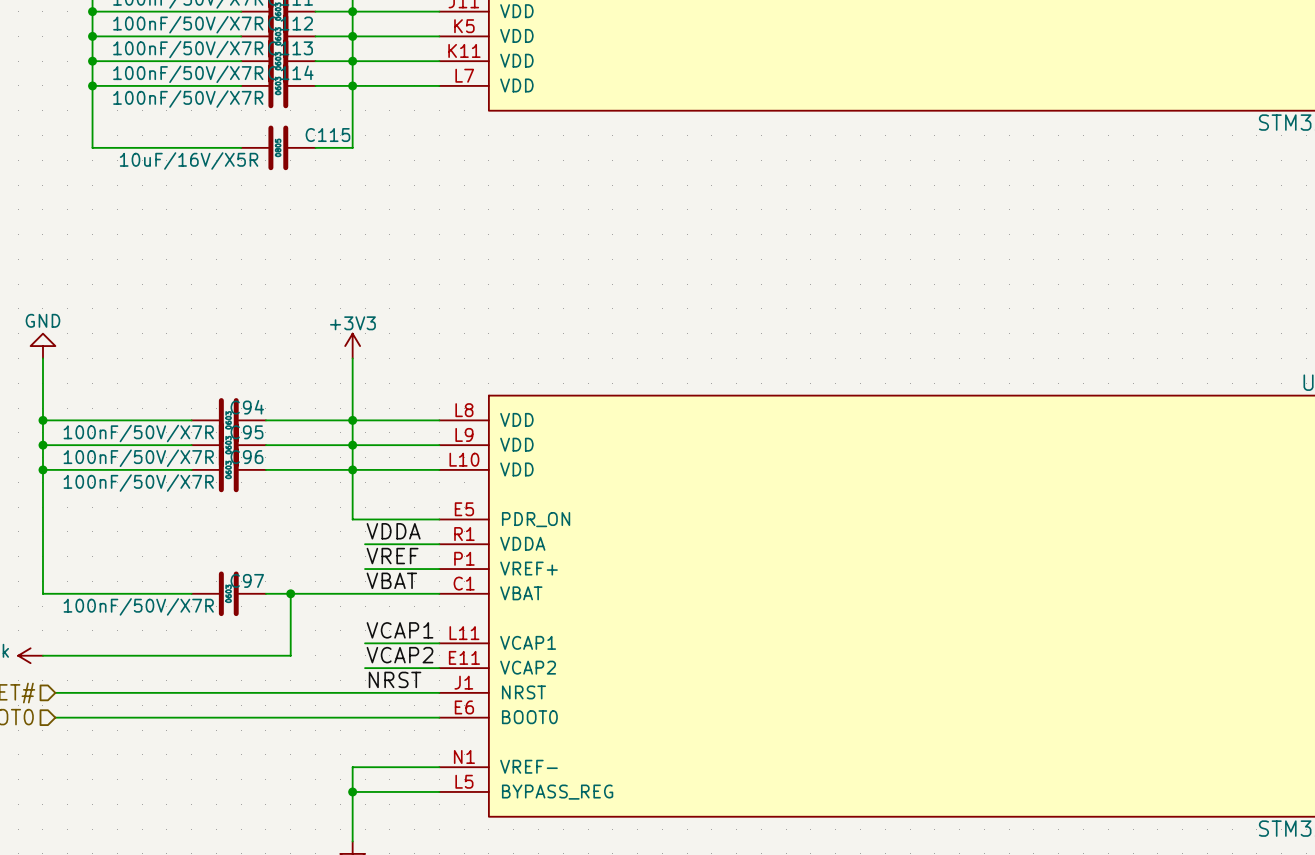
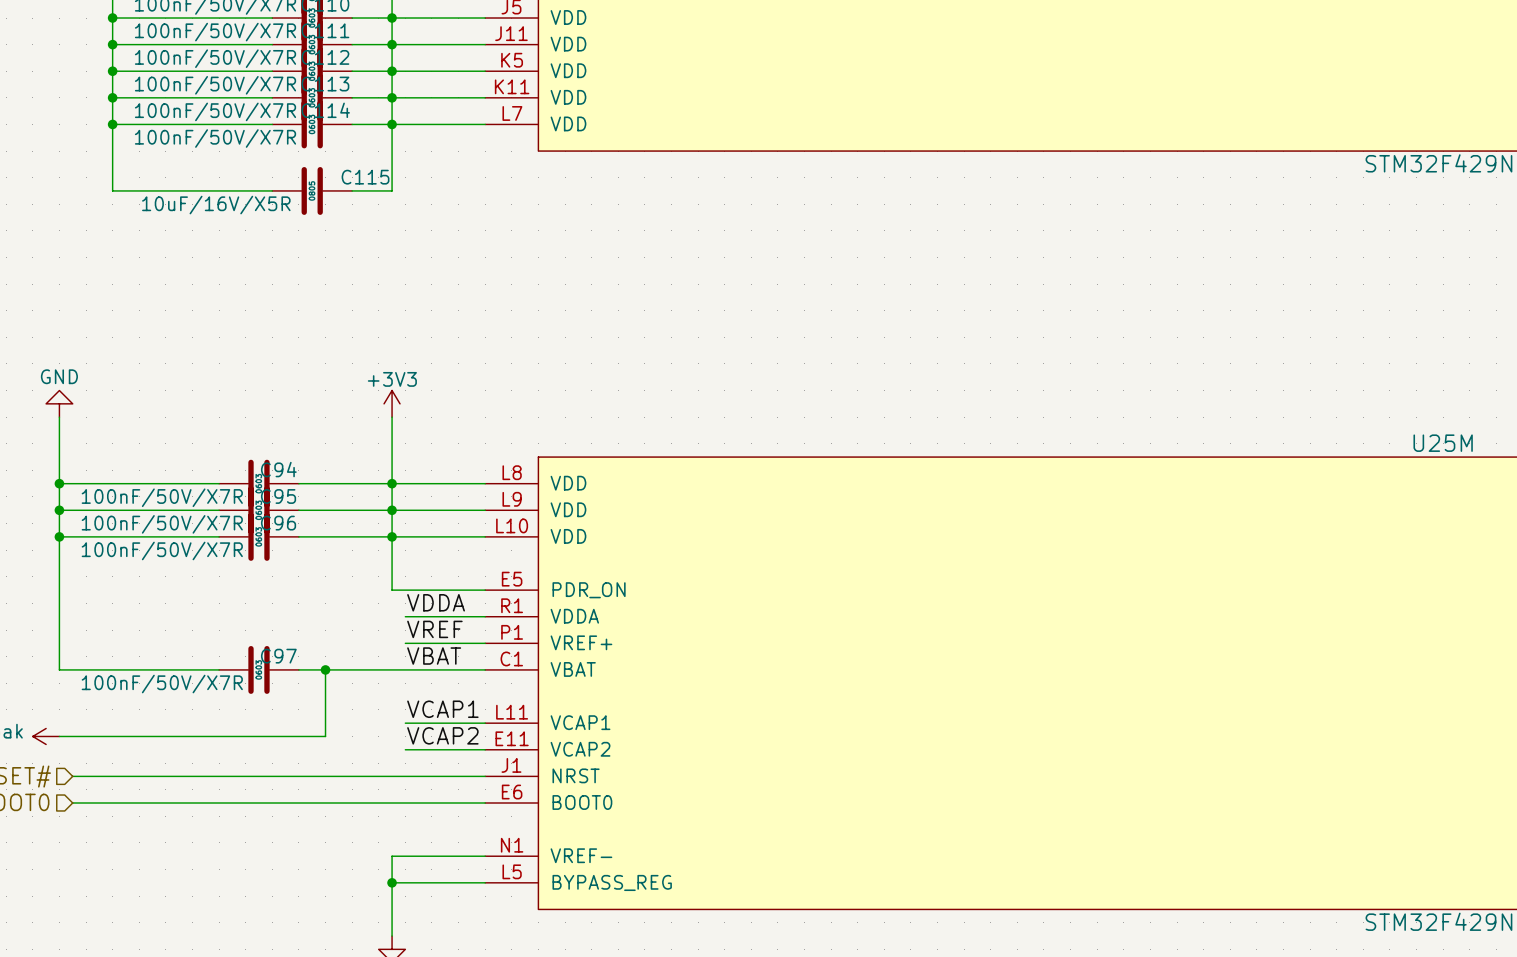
label: NRST (395, 679) -> none

